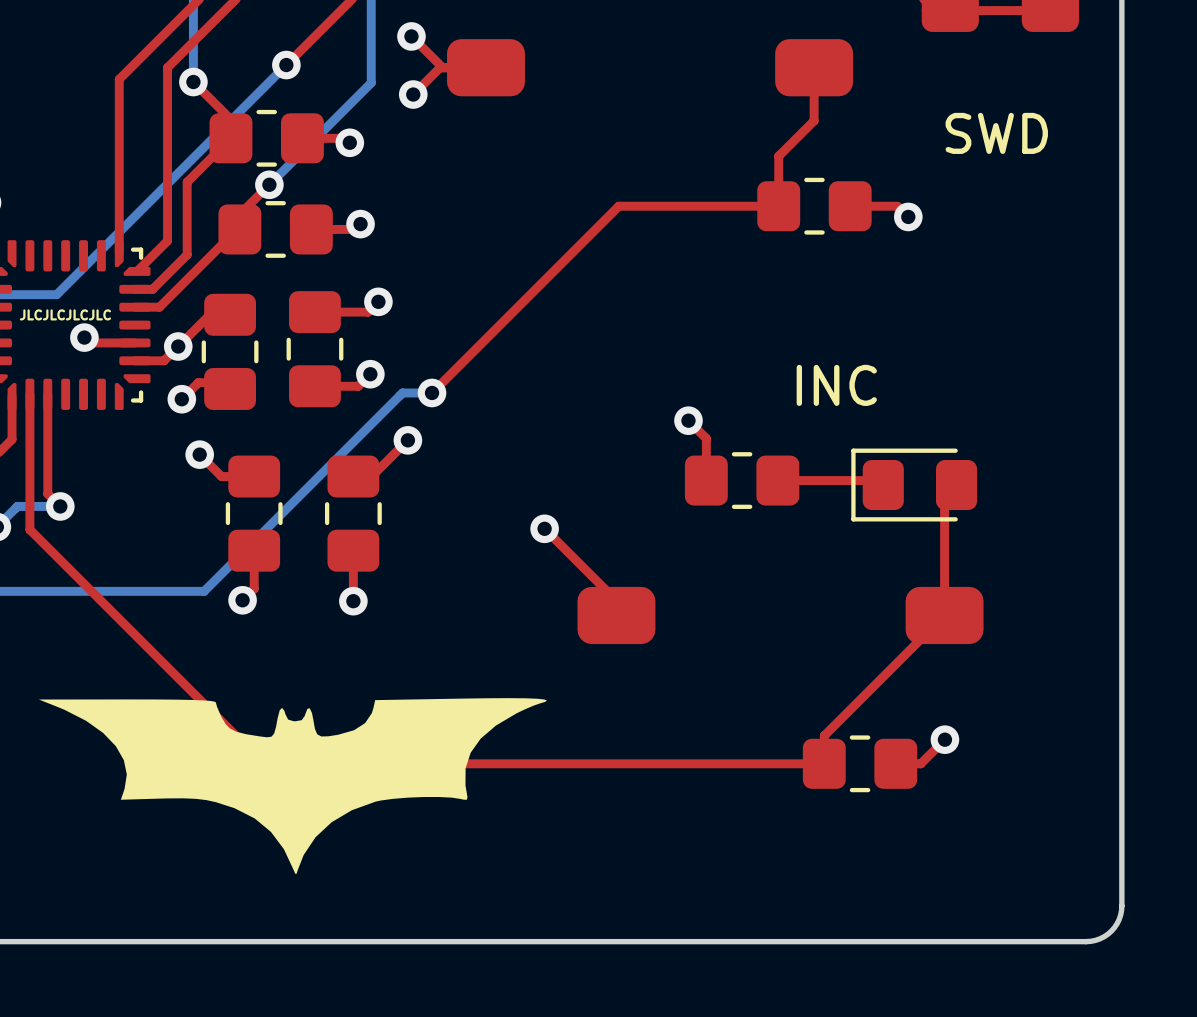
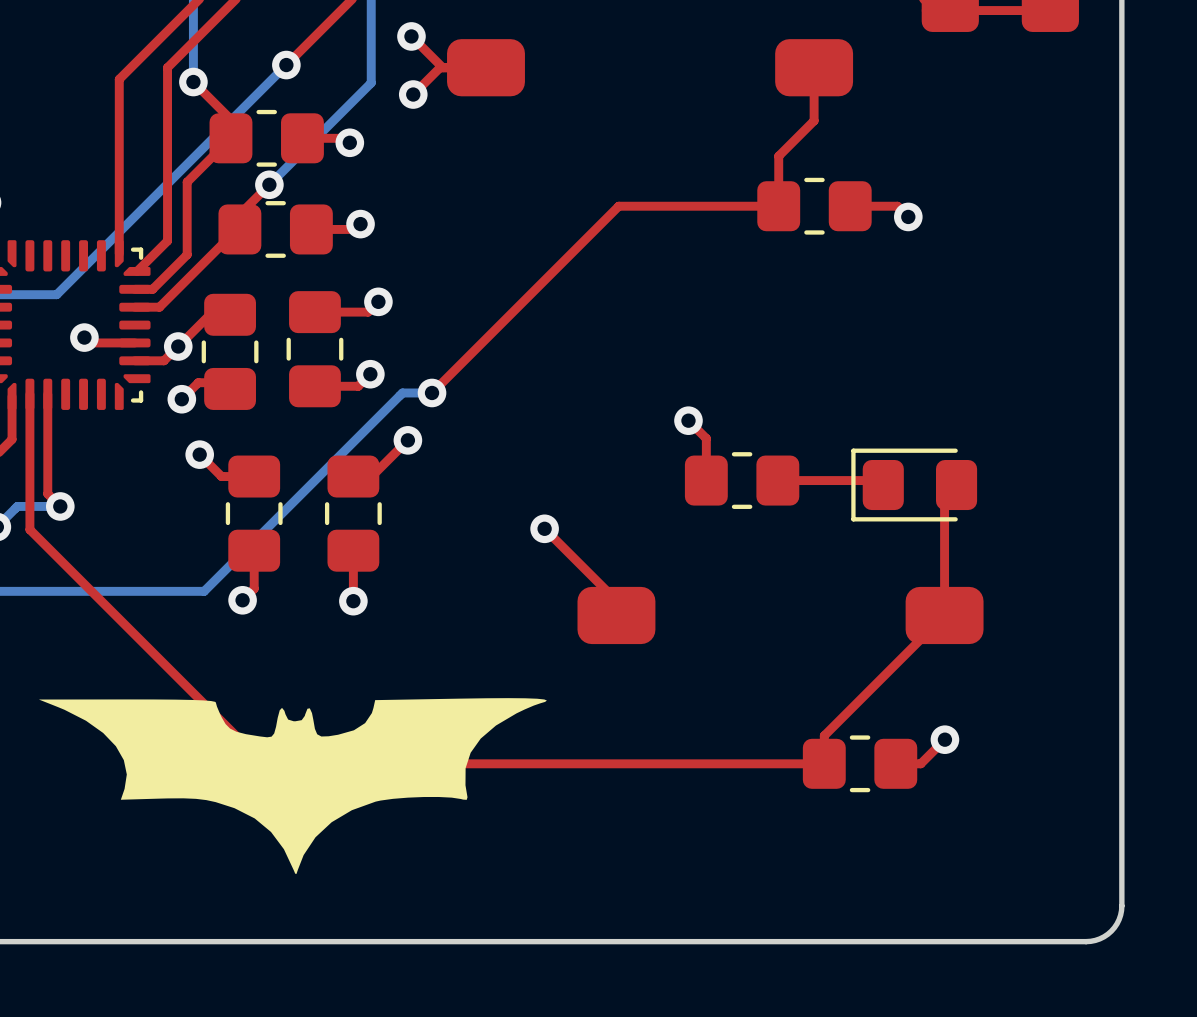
text: SWD (996, 133) -> none
text: JLCJLCJLCJLC (65, 314) -> none
text: INC (836, 385) -> none

